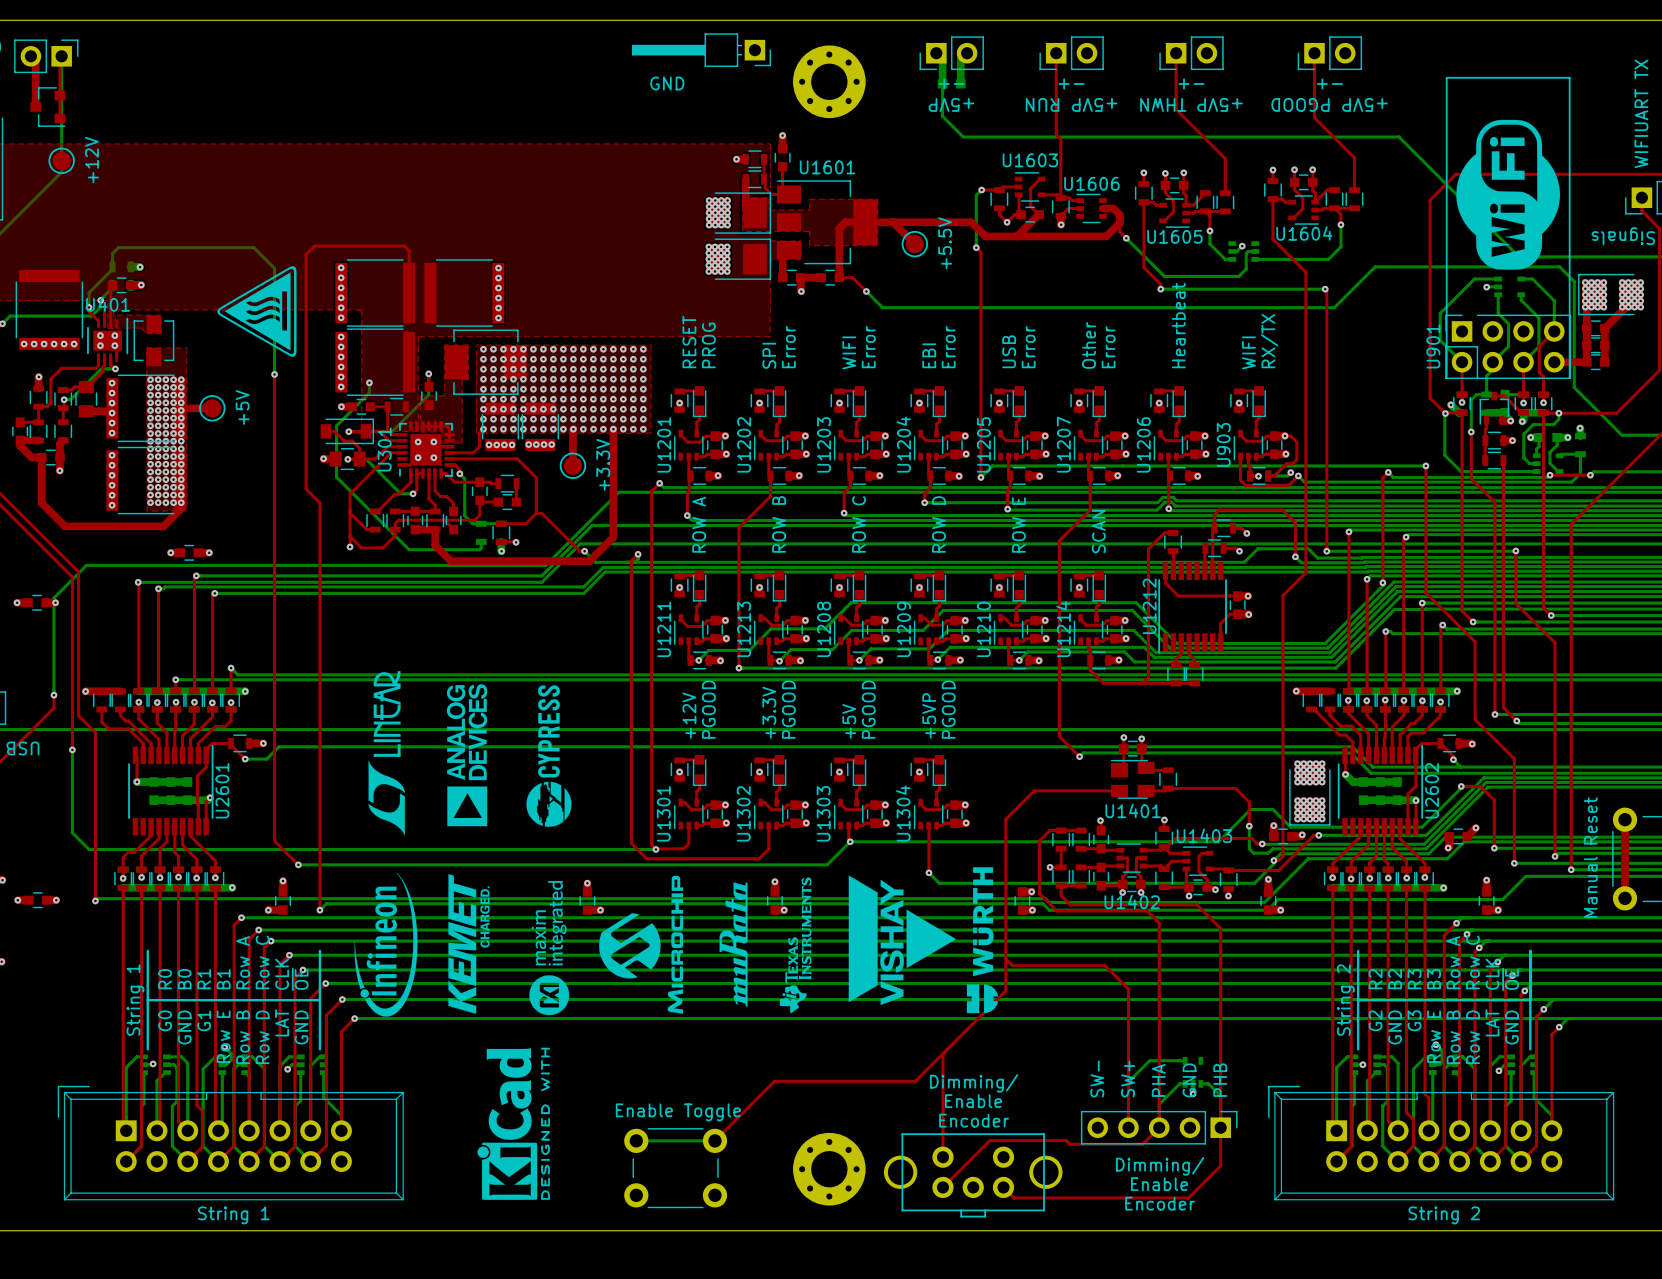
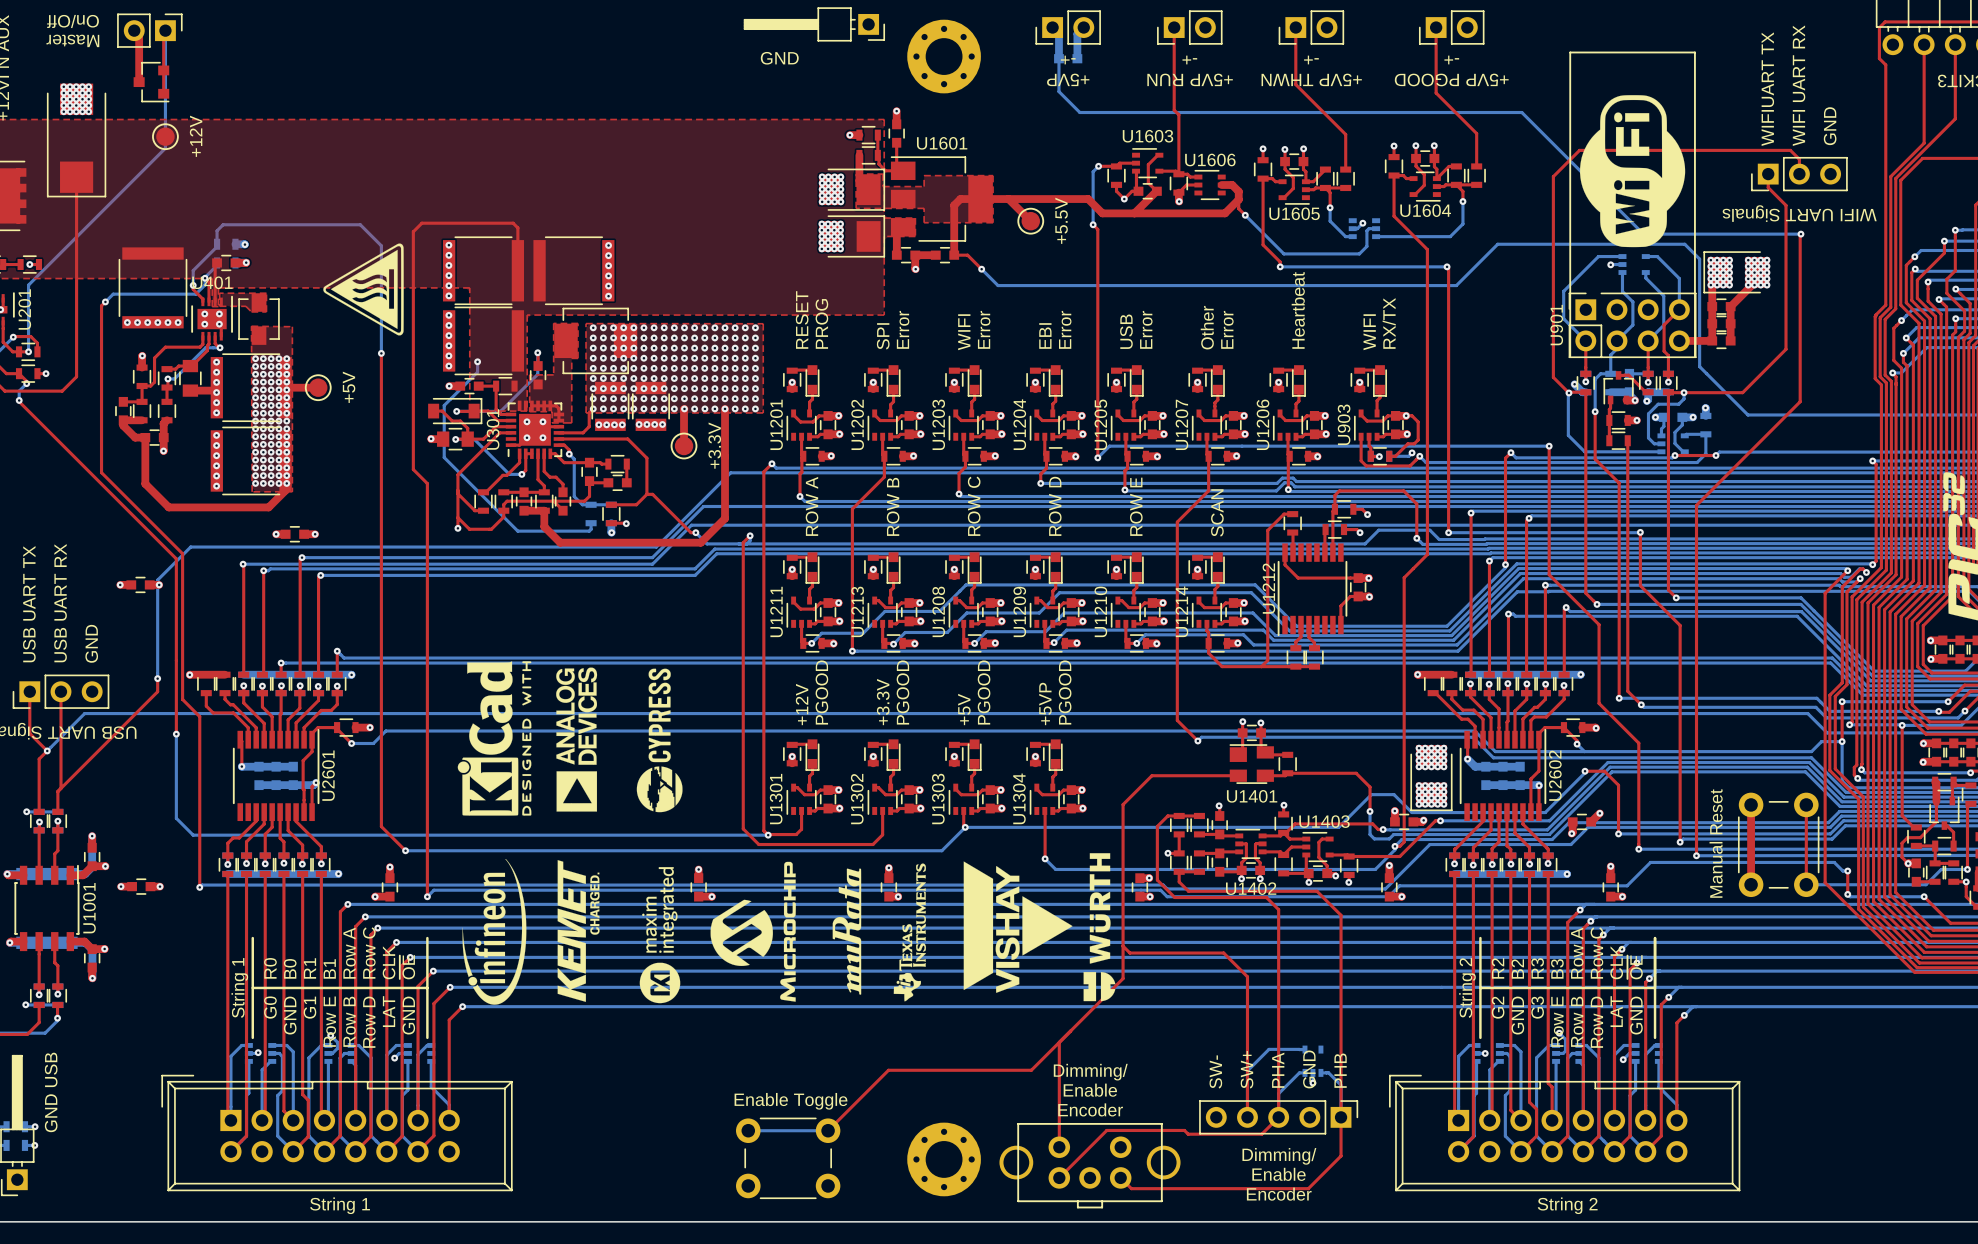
drawing shape: [368, 671, 405, 836] -> [457, 661, 532, 816]
drawing: [477, 1047, 551, 1200] -> none

